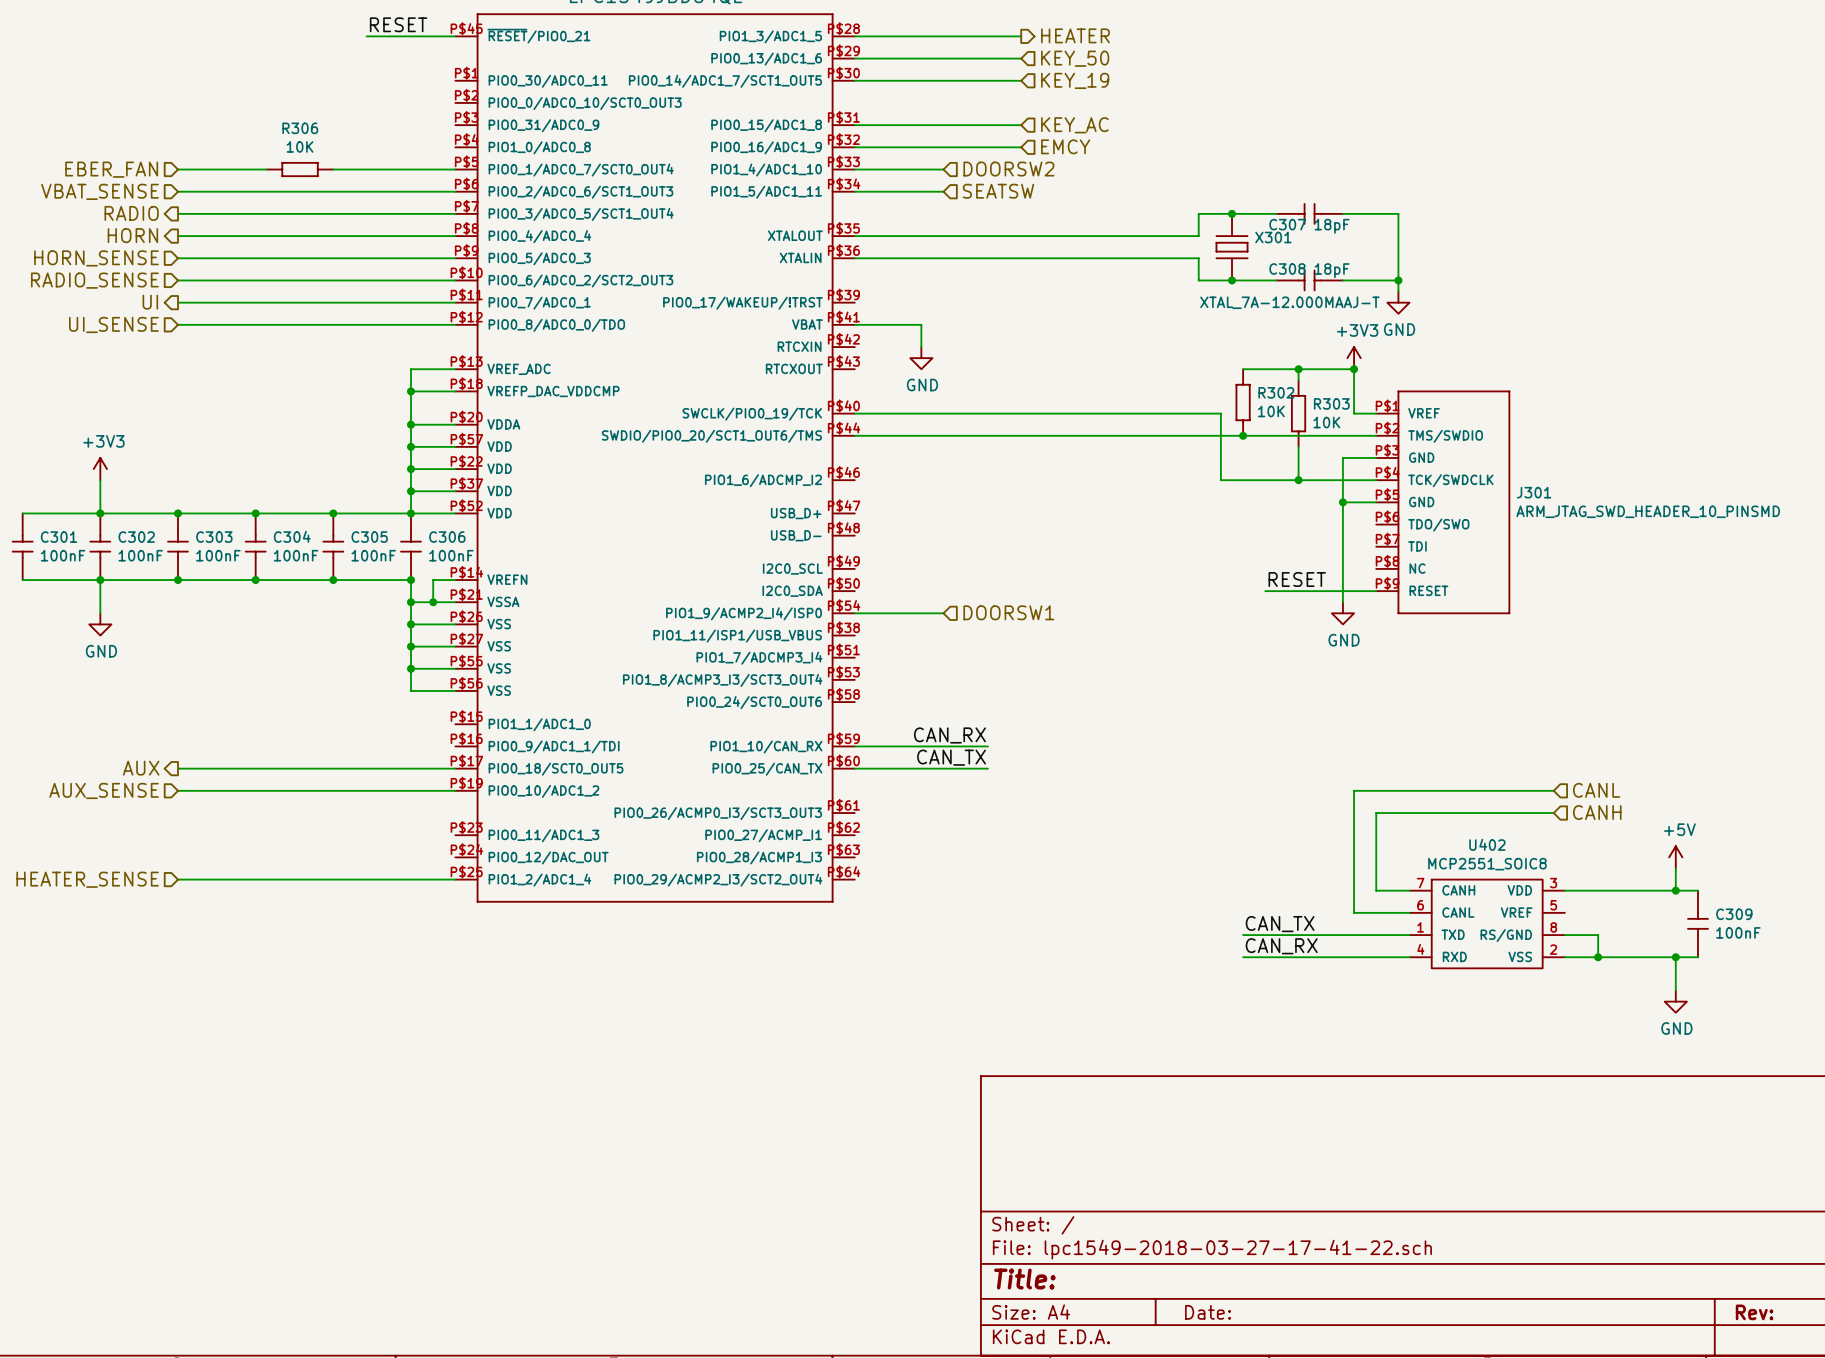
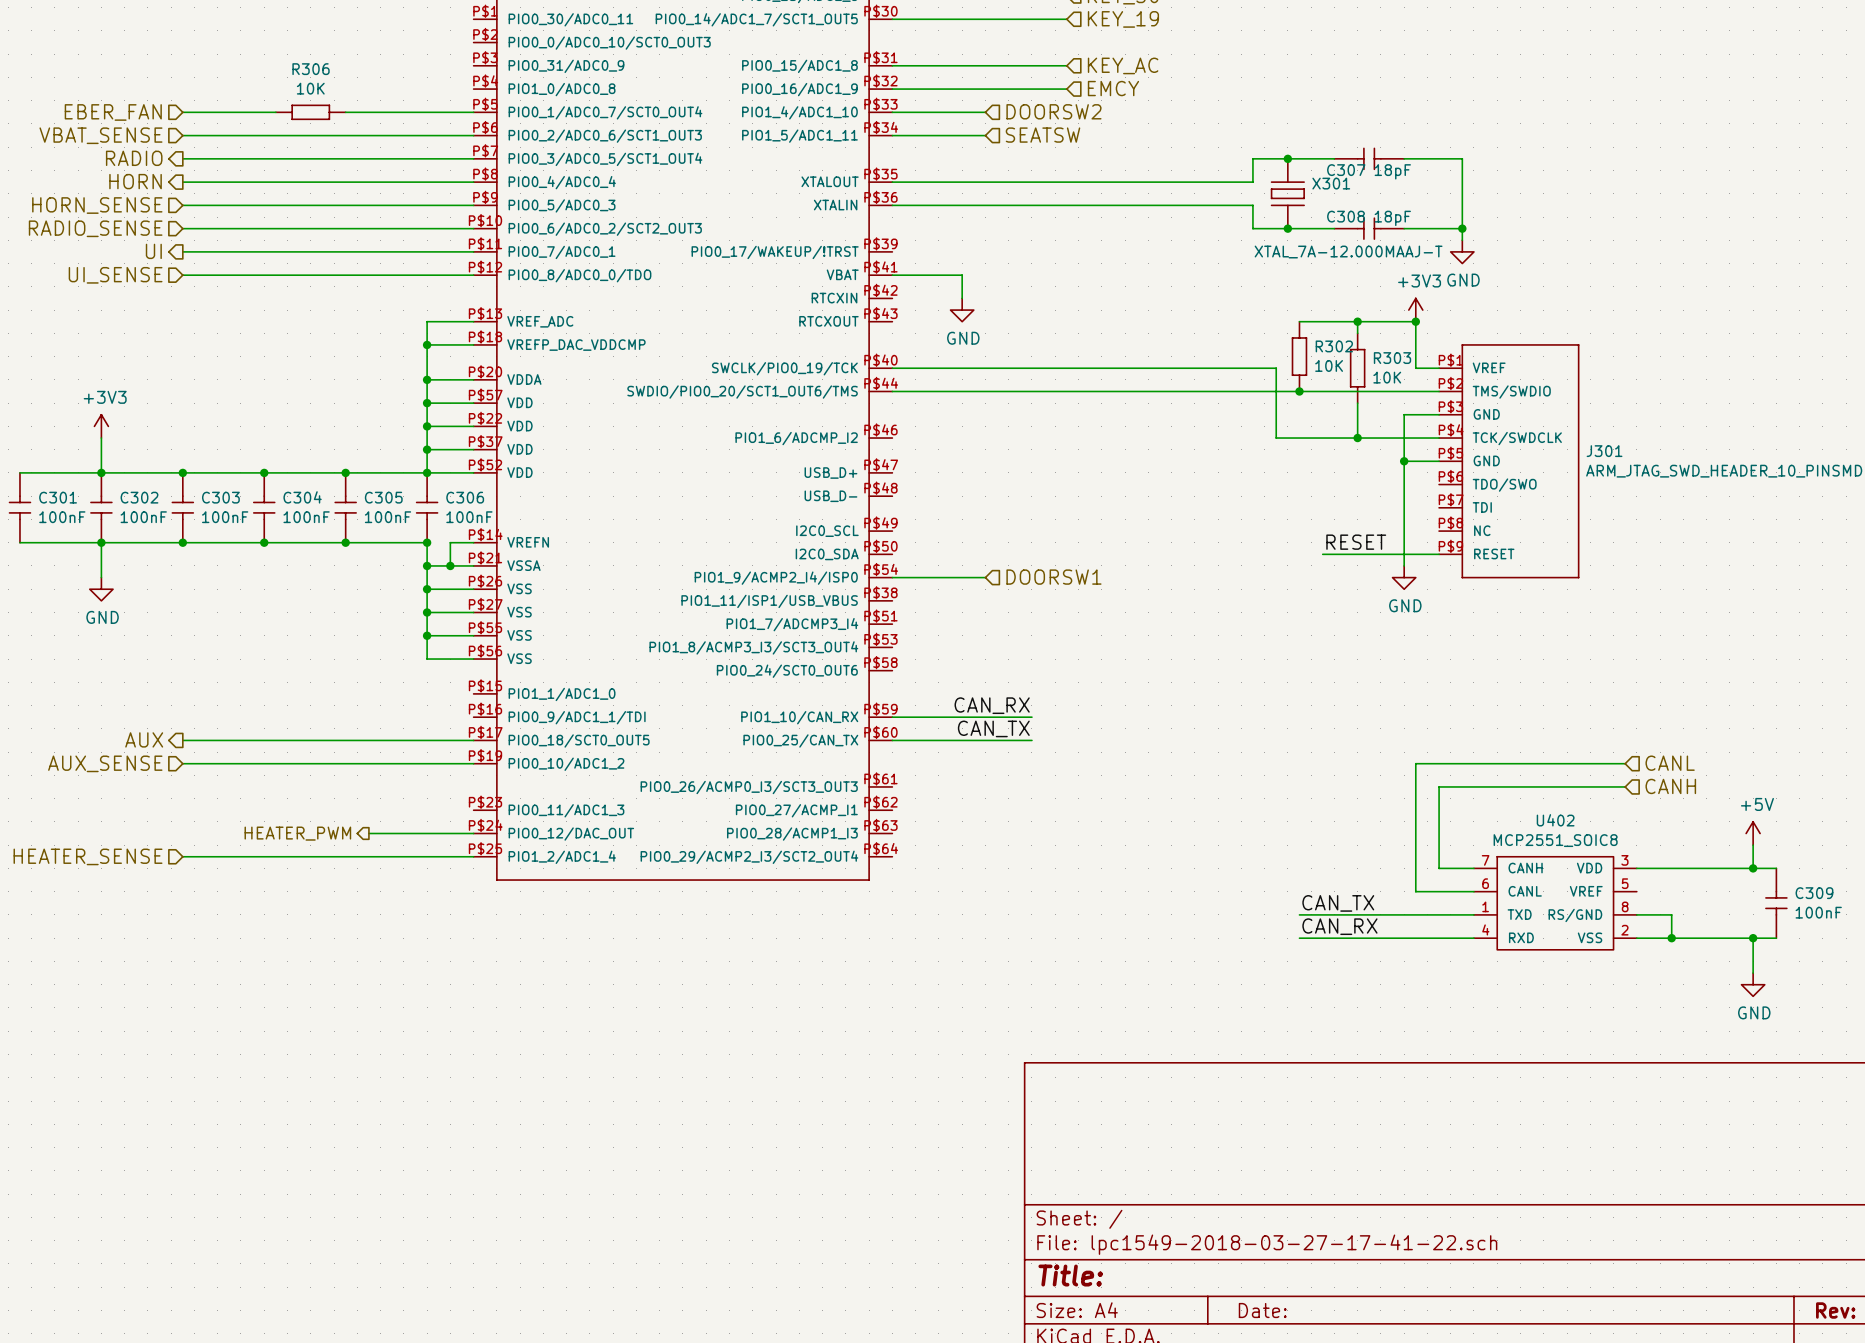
hierarchical label: none -> HEATER_PWM (297, 833)
wire: none -> (368, 833) (473, 833)

